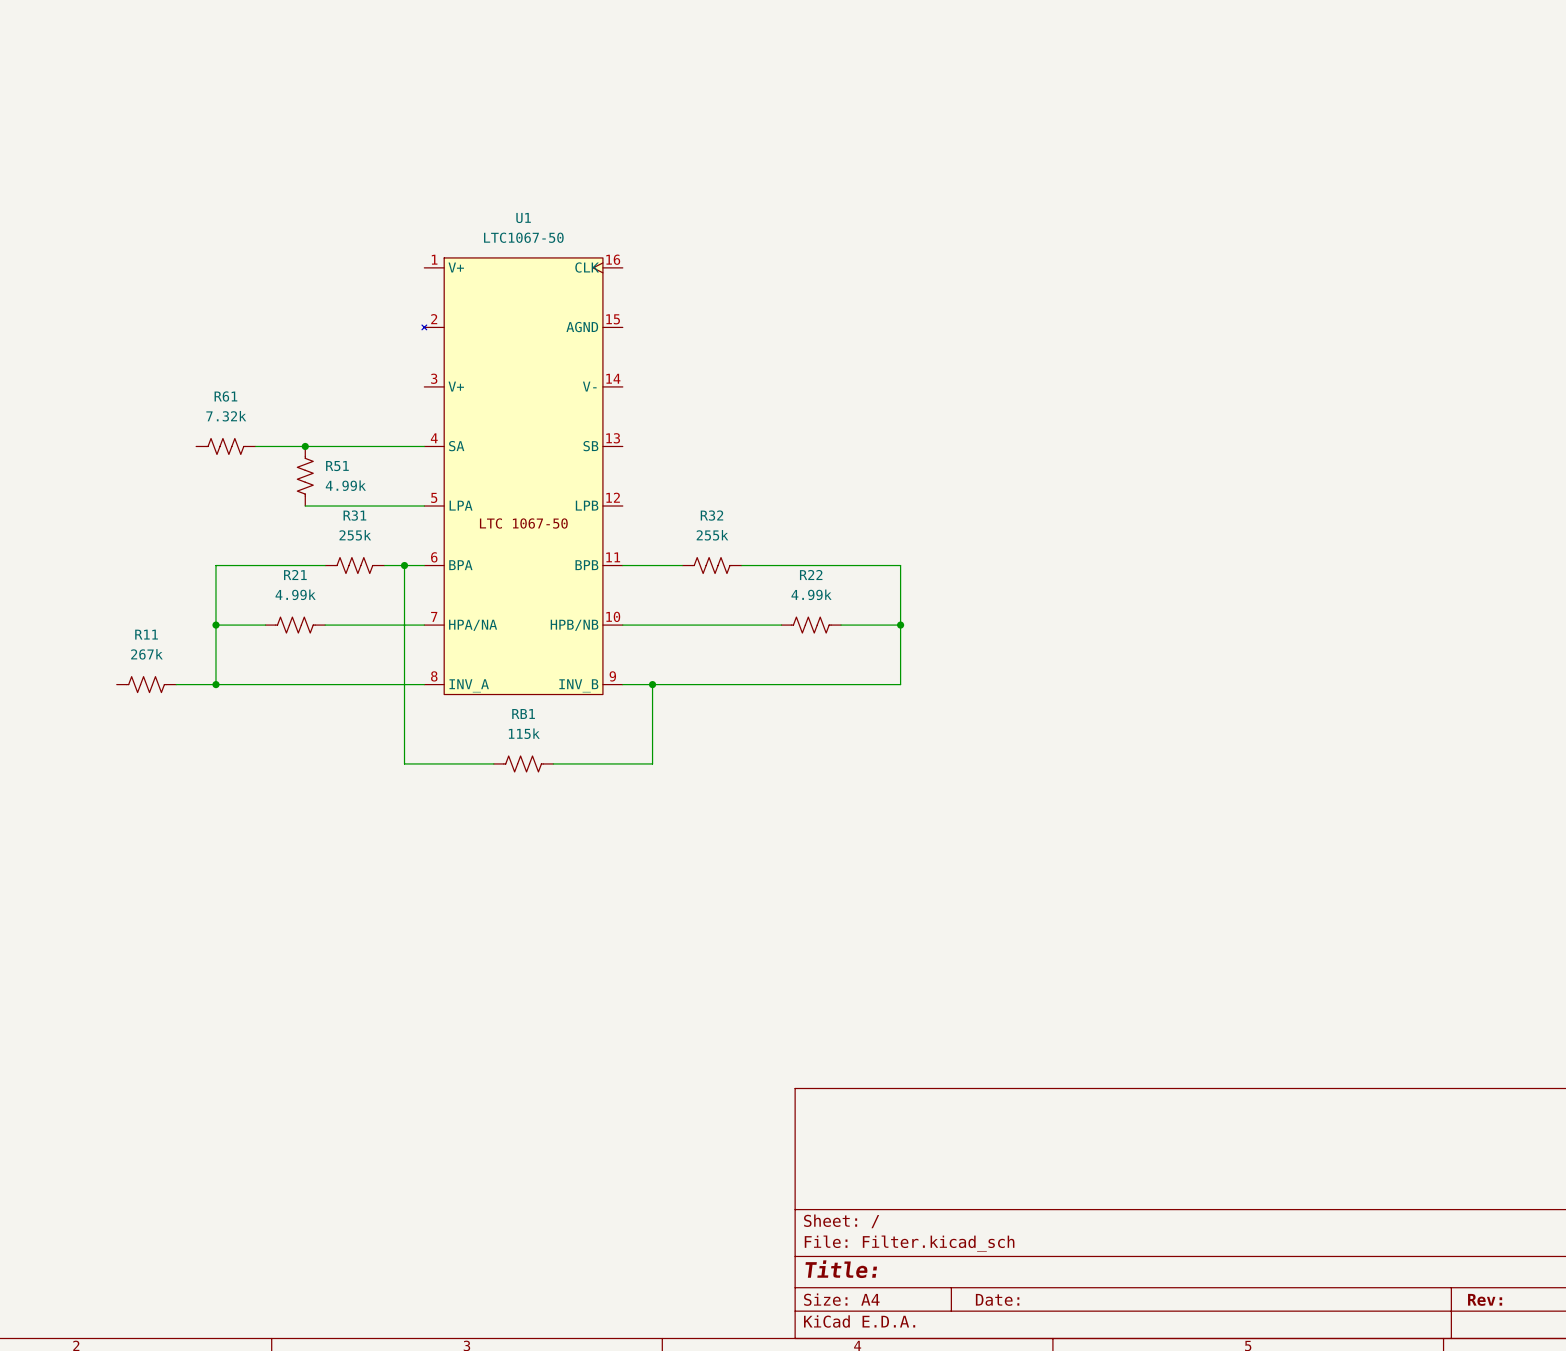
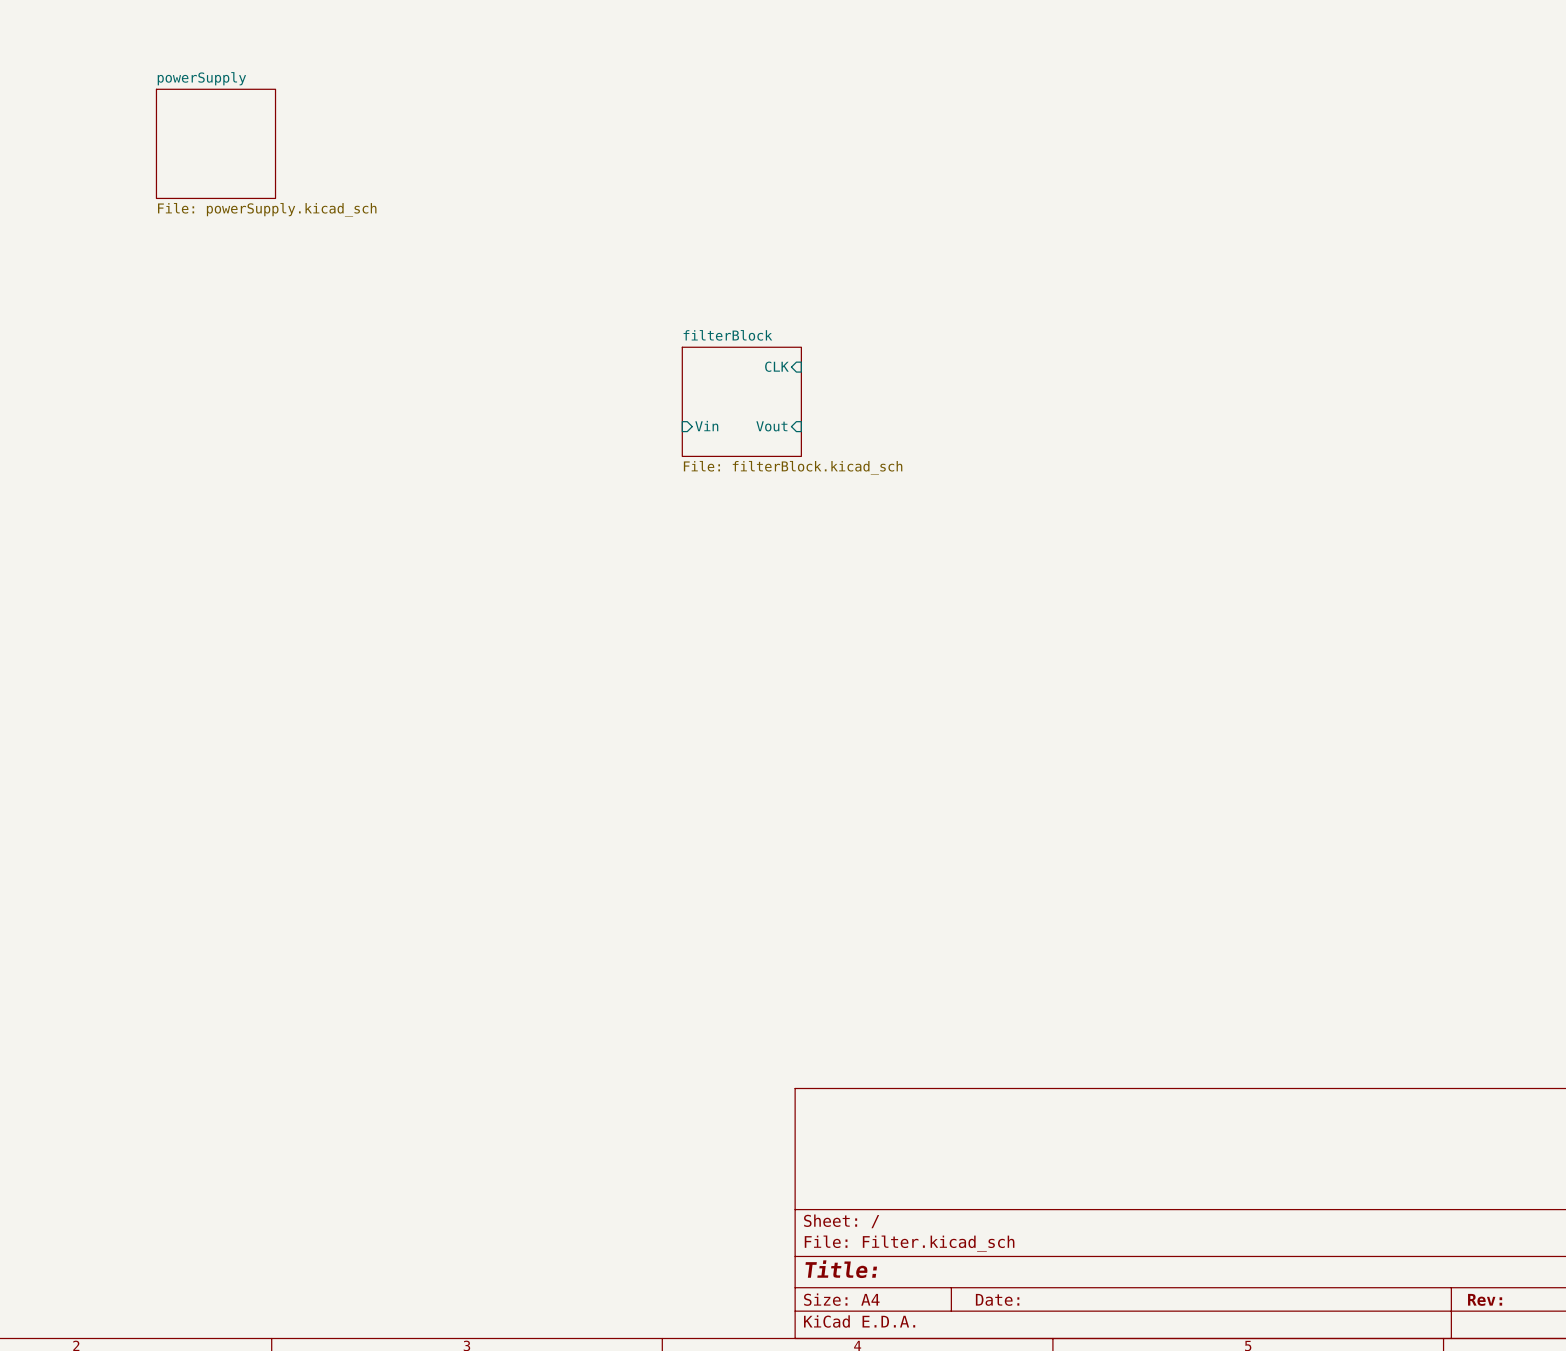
sheet powerSupply: none -> File: powerSupply.kicad_sch (215, 143)
sheet pin: none -> CLK (776, 366)
sheet filterBlock: none -> File: filterBlock.kicad_sch (741, 401)
sheet pin: none -> Vin (706, 426)
sheet pin: none -> Vout (771, 426)
R61: 7.32k (225, 446) -> none
wire: (255, 446) (424, 446) -> none
junction: (305, 446) -> none
R51: 4.99k (305, 476) -> none
U1: LTC1067-50 (522, 476) -> none
wire: (305, 506) (424, 506) -> none
wire: (325, 565) (215, 565) (215, 684) -> none
R31: 255k (354, 565) -> none
wire: (384, 565) (424, 565) -> none
wire: (404, 565) (404, 763) (493, 763) -> none
junction: (404, 565) -> none
wire: (622, 565) (682, 565) -> none
R32: 255k (712, 565) -> none
wire: (741, 565) (900, 565) (900, 684) (622, 684) -> none
wire: (215, 625) (265, 625) -> none
junction: (215, 625) -> none
R21: 4.99k (295, 625) -> none
wire: (325, 625) (424, 625) -> none
wire: (622, 625) (781, 625) -> none
R22: 4.99k (811, 625) -> none
wire: (841, 625) (900, 625) -> none
junction: (900, 625) -> none
R11: 267k (146, 684) -> none
wire: (176, 684) (424, 684) -> none
junction: (215, 684) -> none
wire: (652, 684) (652, 763) (553, 763) -> none
junction: (652, 684) -> none
RB1: 115k (523, 763) -> none

